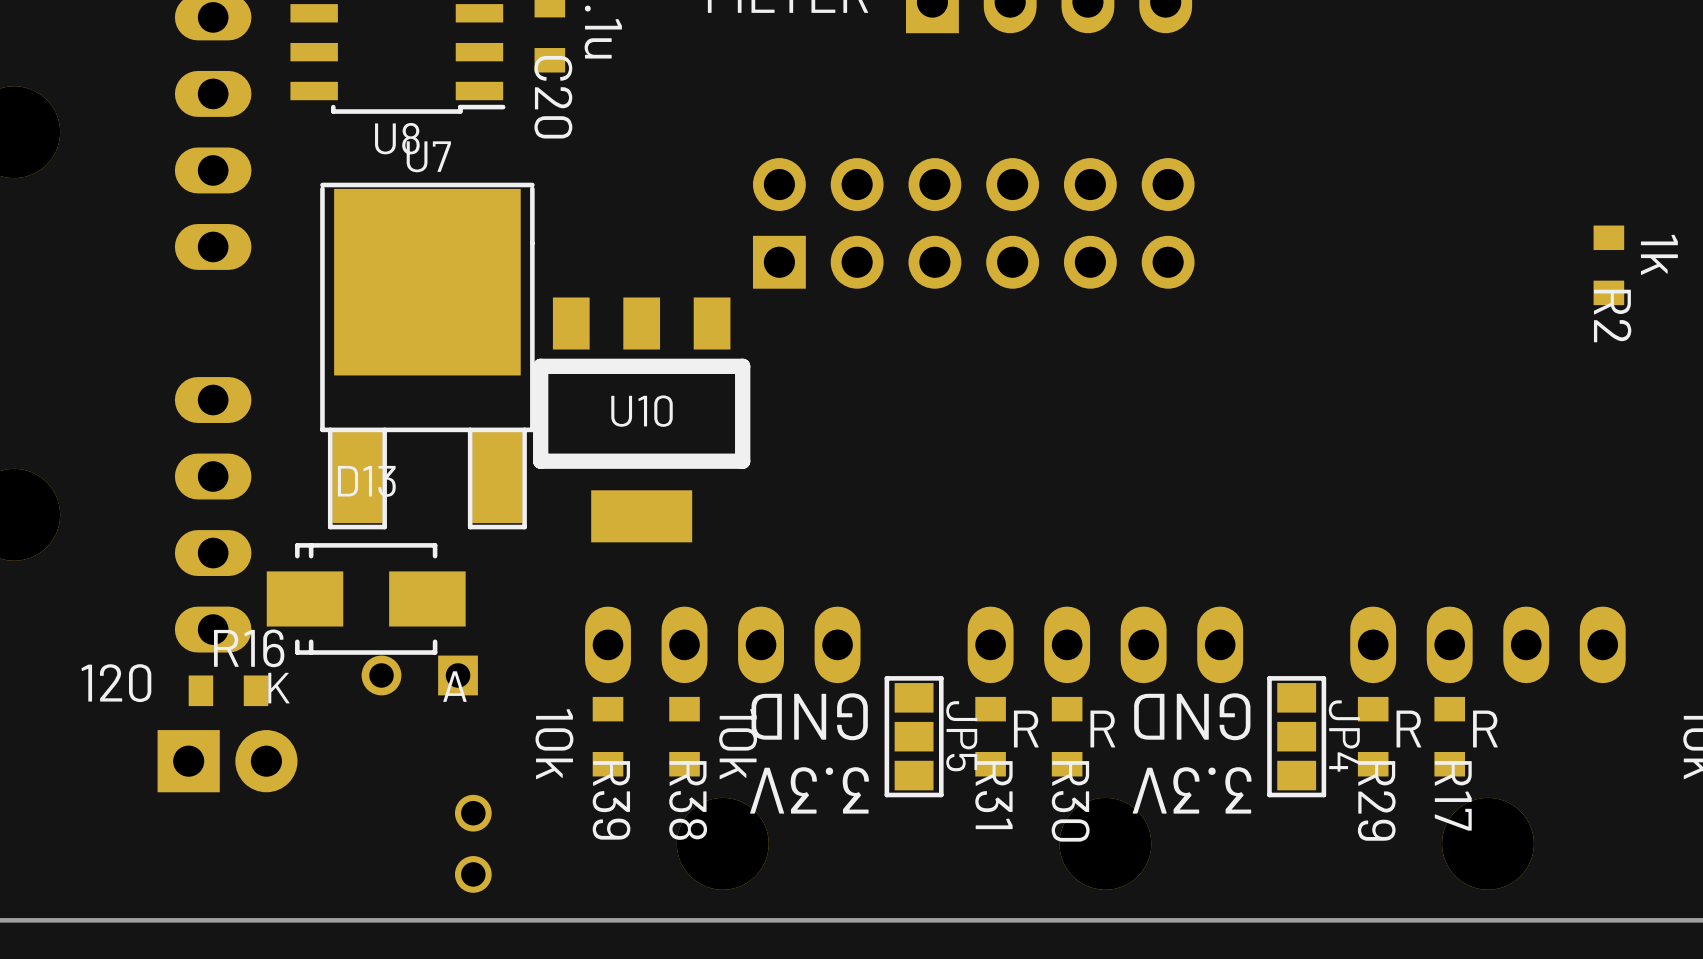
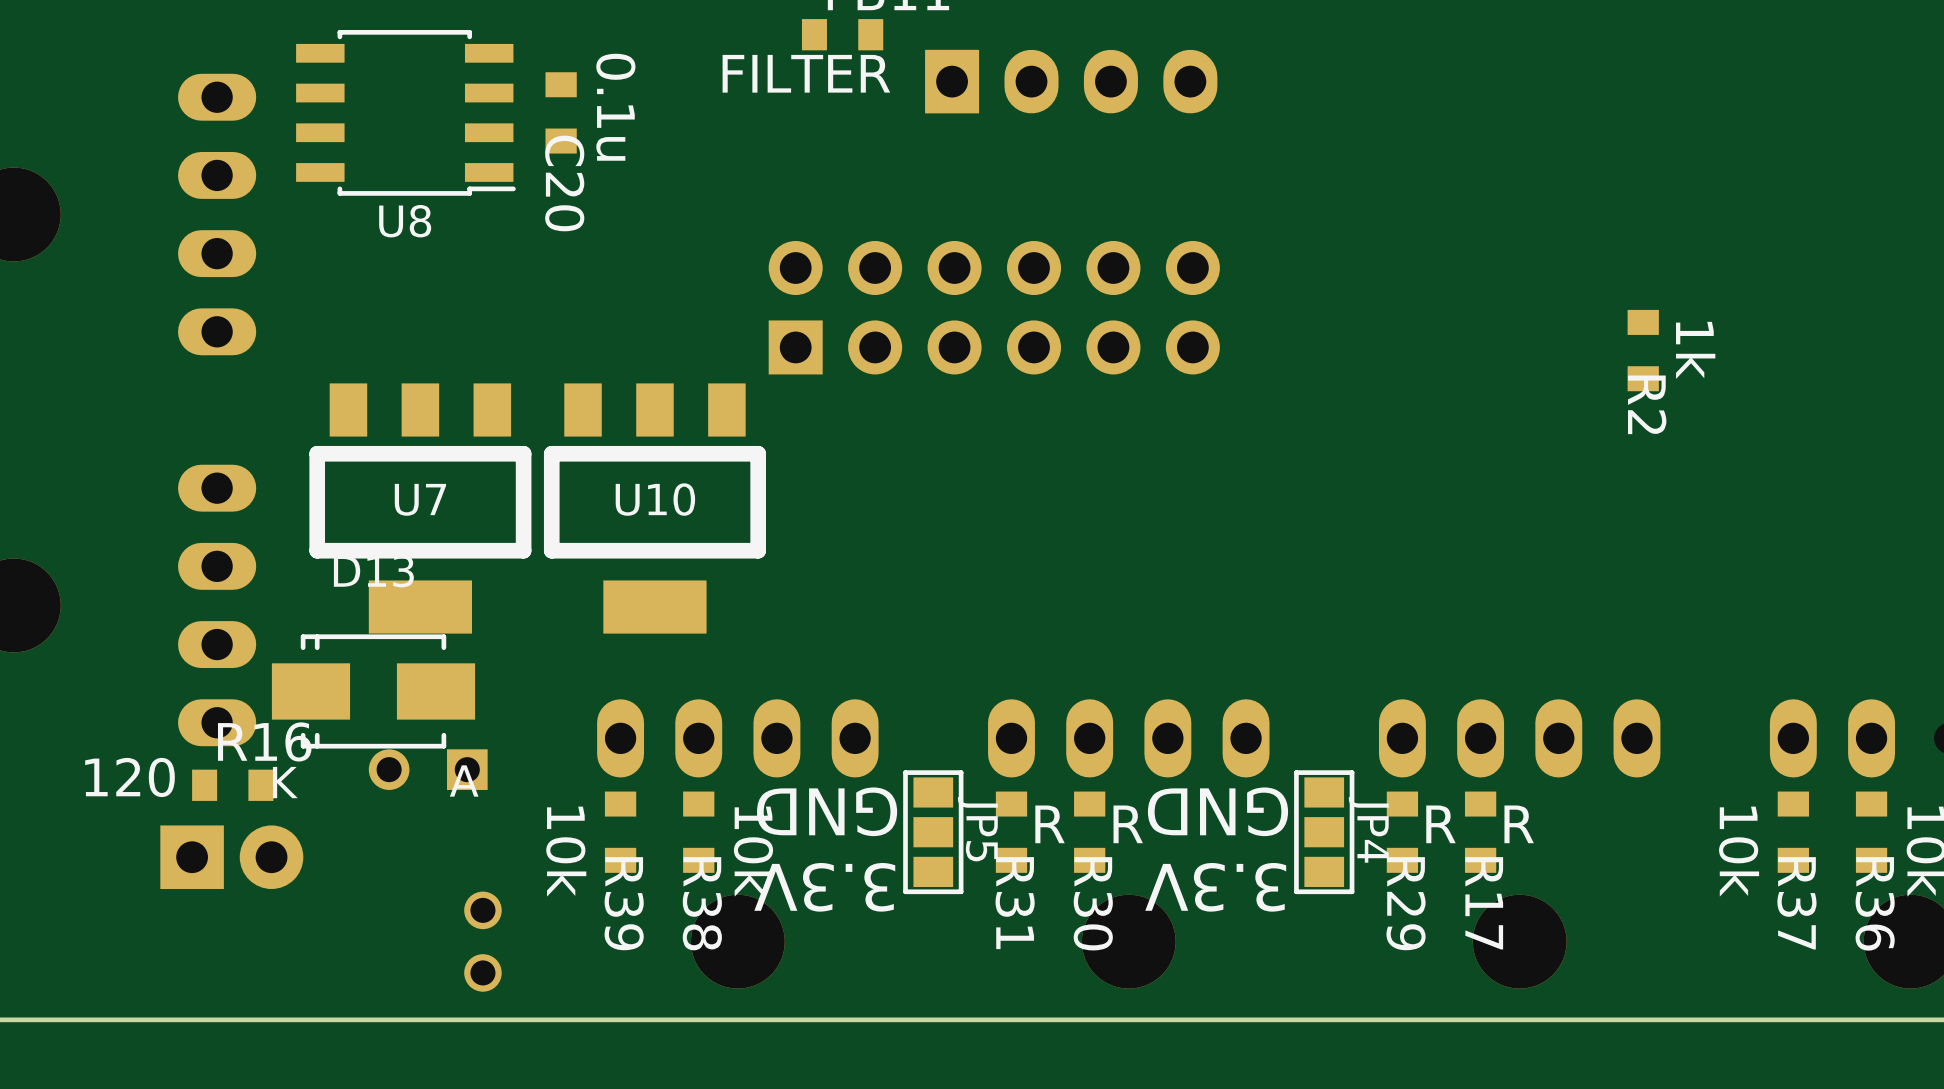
U7 name position: U7 (428, 156) -> U7 (420, 499)
U7 footprint: [320, 182, 535, 530] -> [309, 383, 532, 634]

